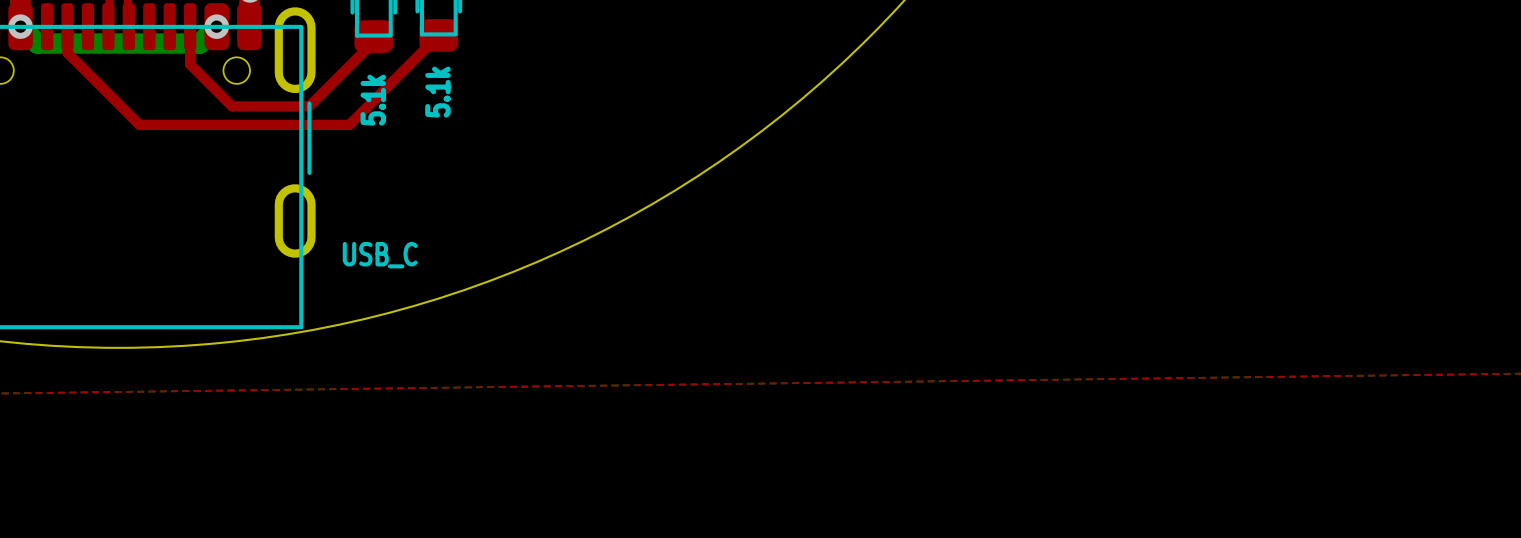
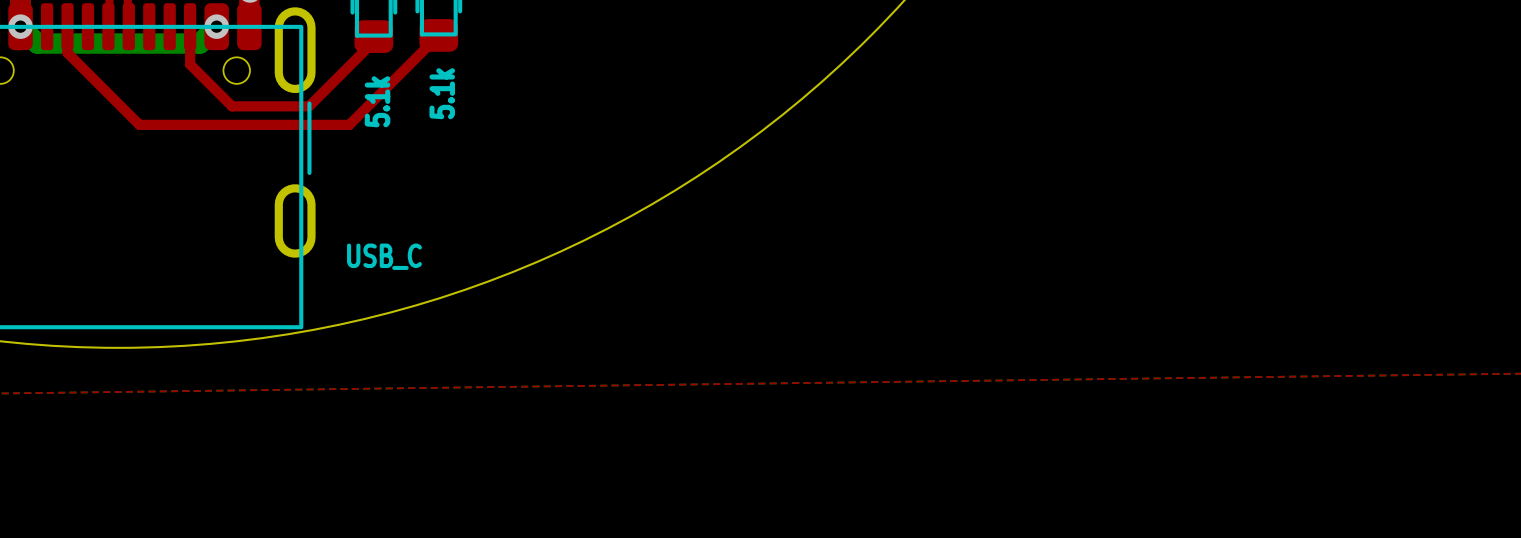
part value: 5.1k (437, 92) -> none
text: none -> 5.1k (442, 93)
part value: 5.1k (373, 100) -> none
text: none -> 5.1k (377, 101)
part value: USB_C (380, 255) -> none
text: none -> USB_C (384, 256)

